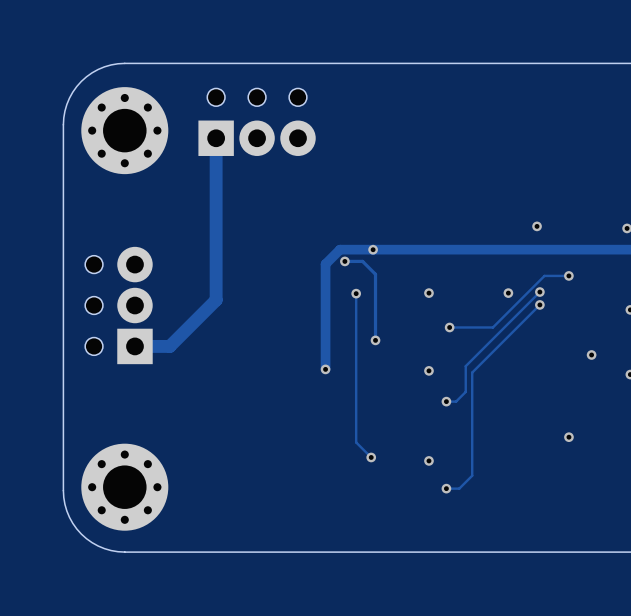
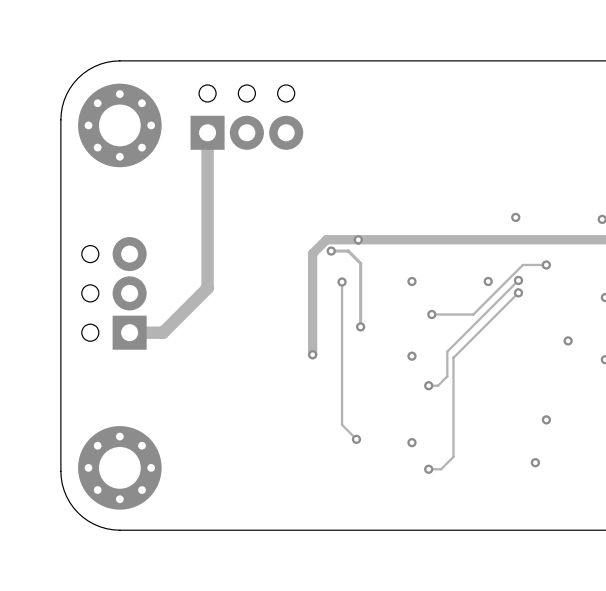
via: none -> (535, 462)

